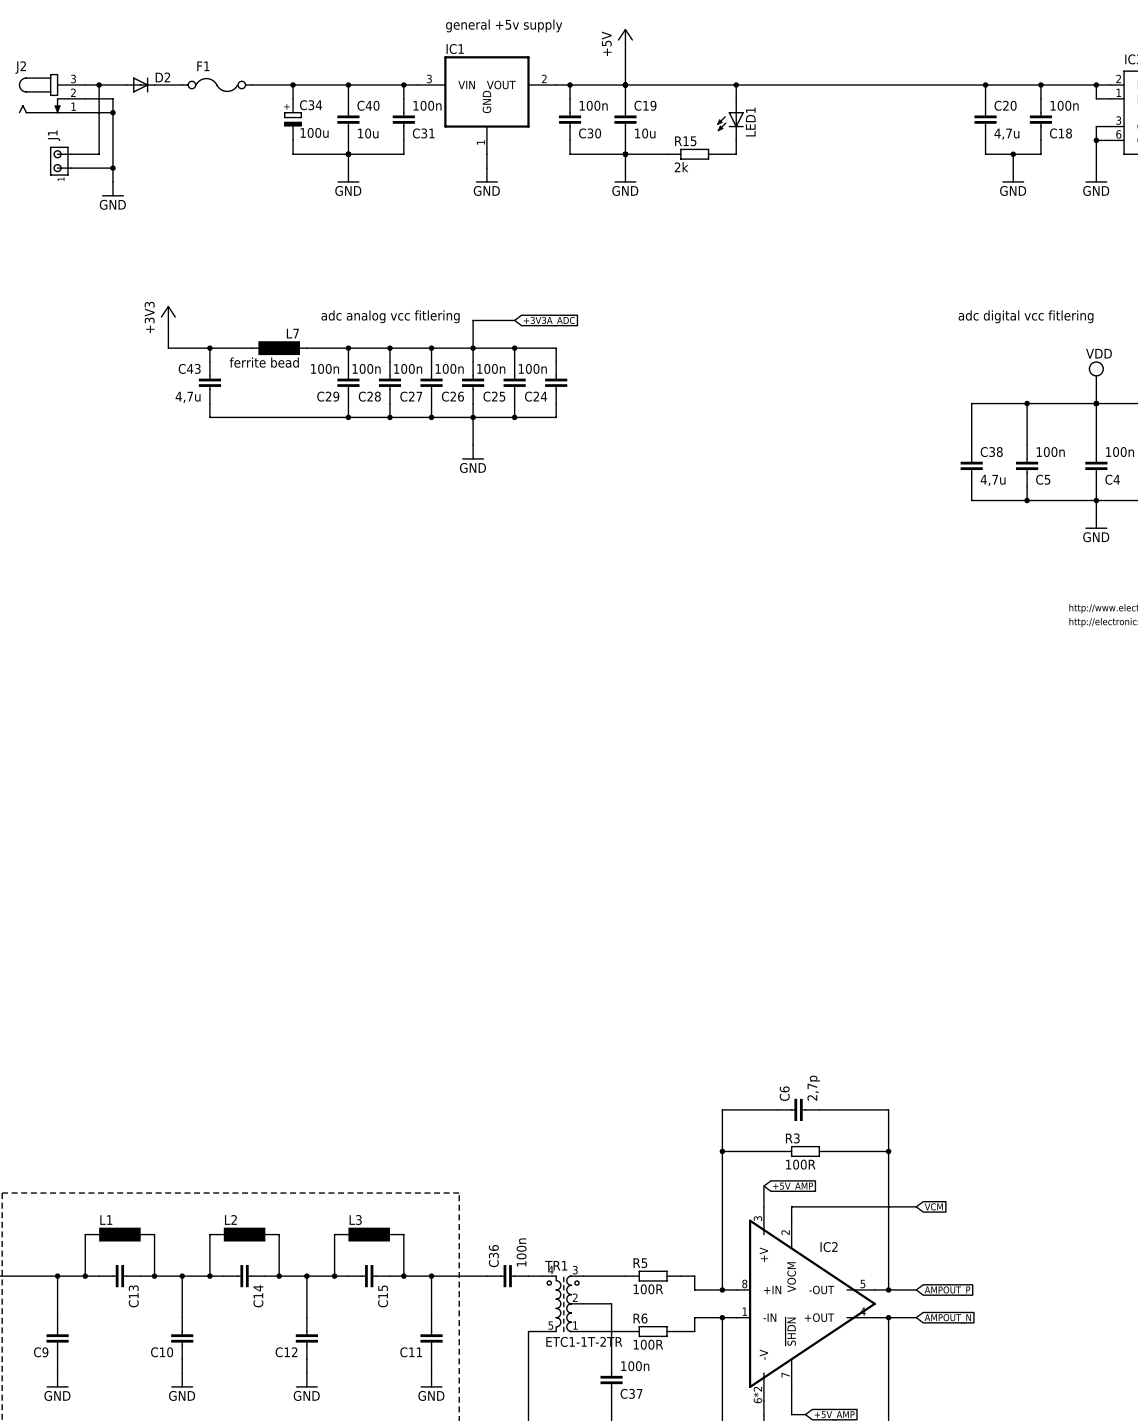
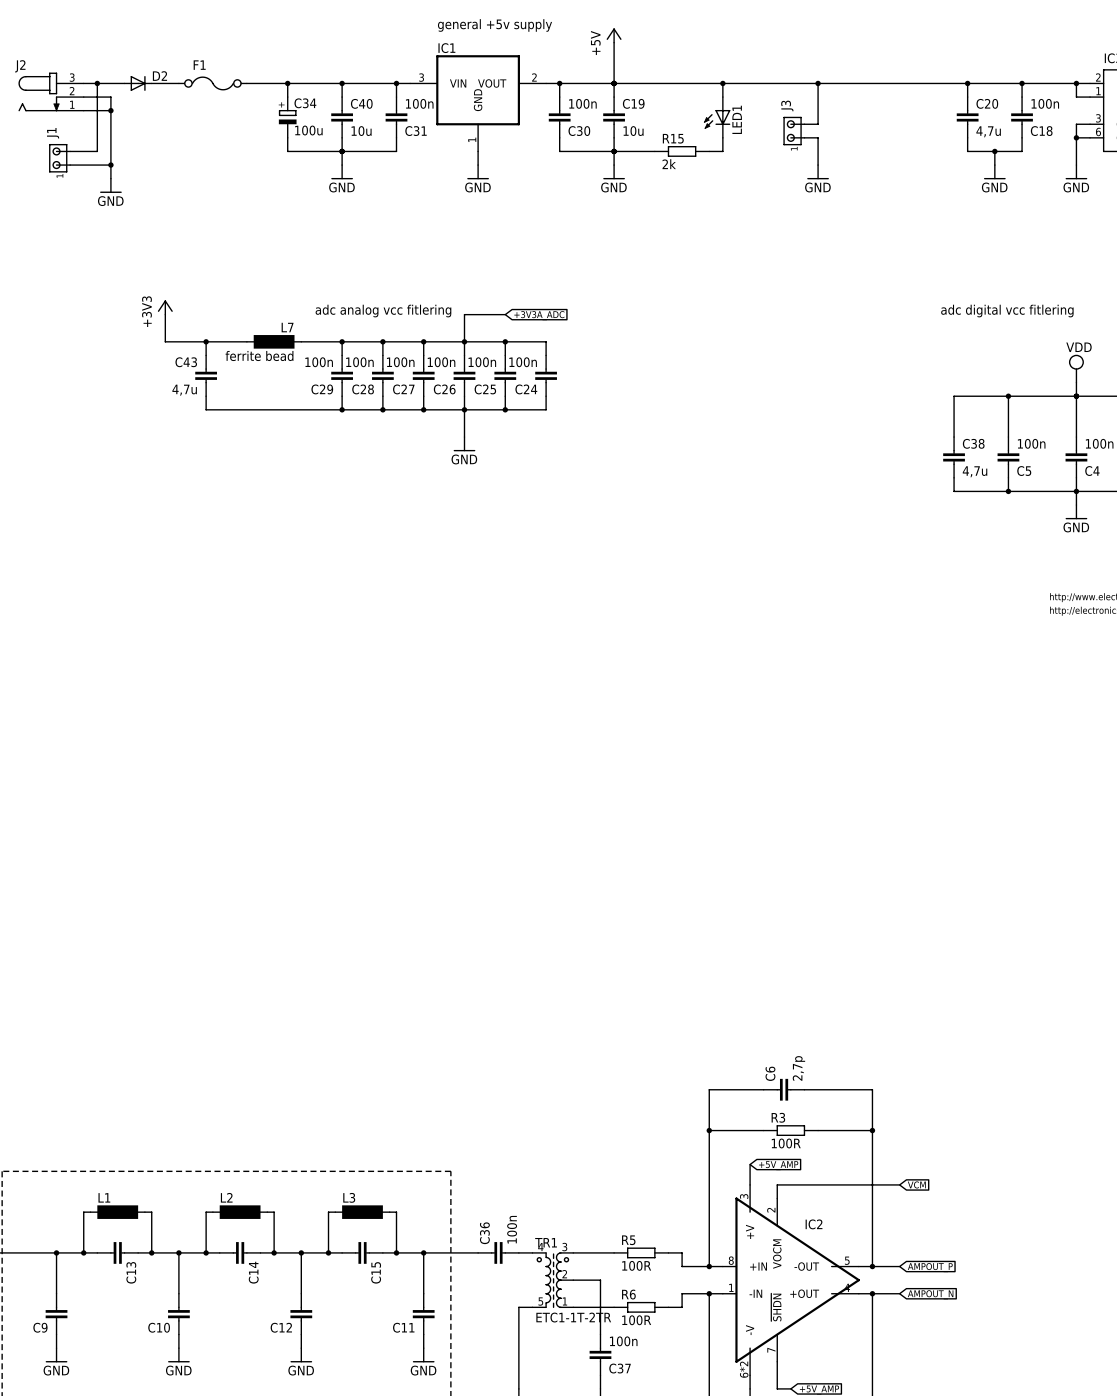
wire: none -> (818, 83) (818, 124) (804, 124)
junction: none -> (818, 83)
J3: none -> (793, 131)
wire: none -> (804, 137) (818, 137) (818, 165)
power symbol: none -> GND (818, 172)

